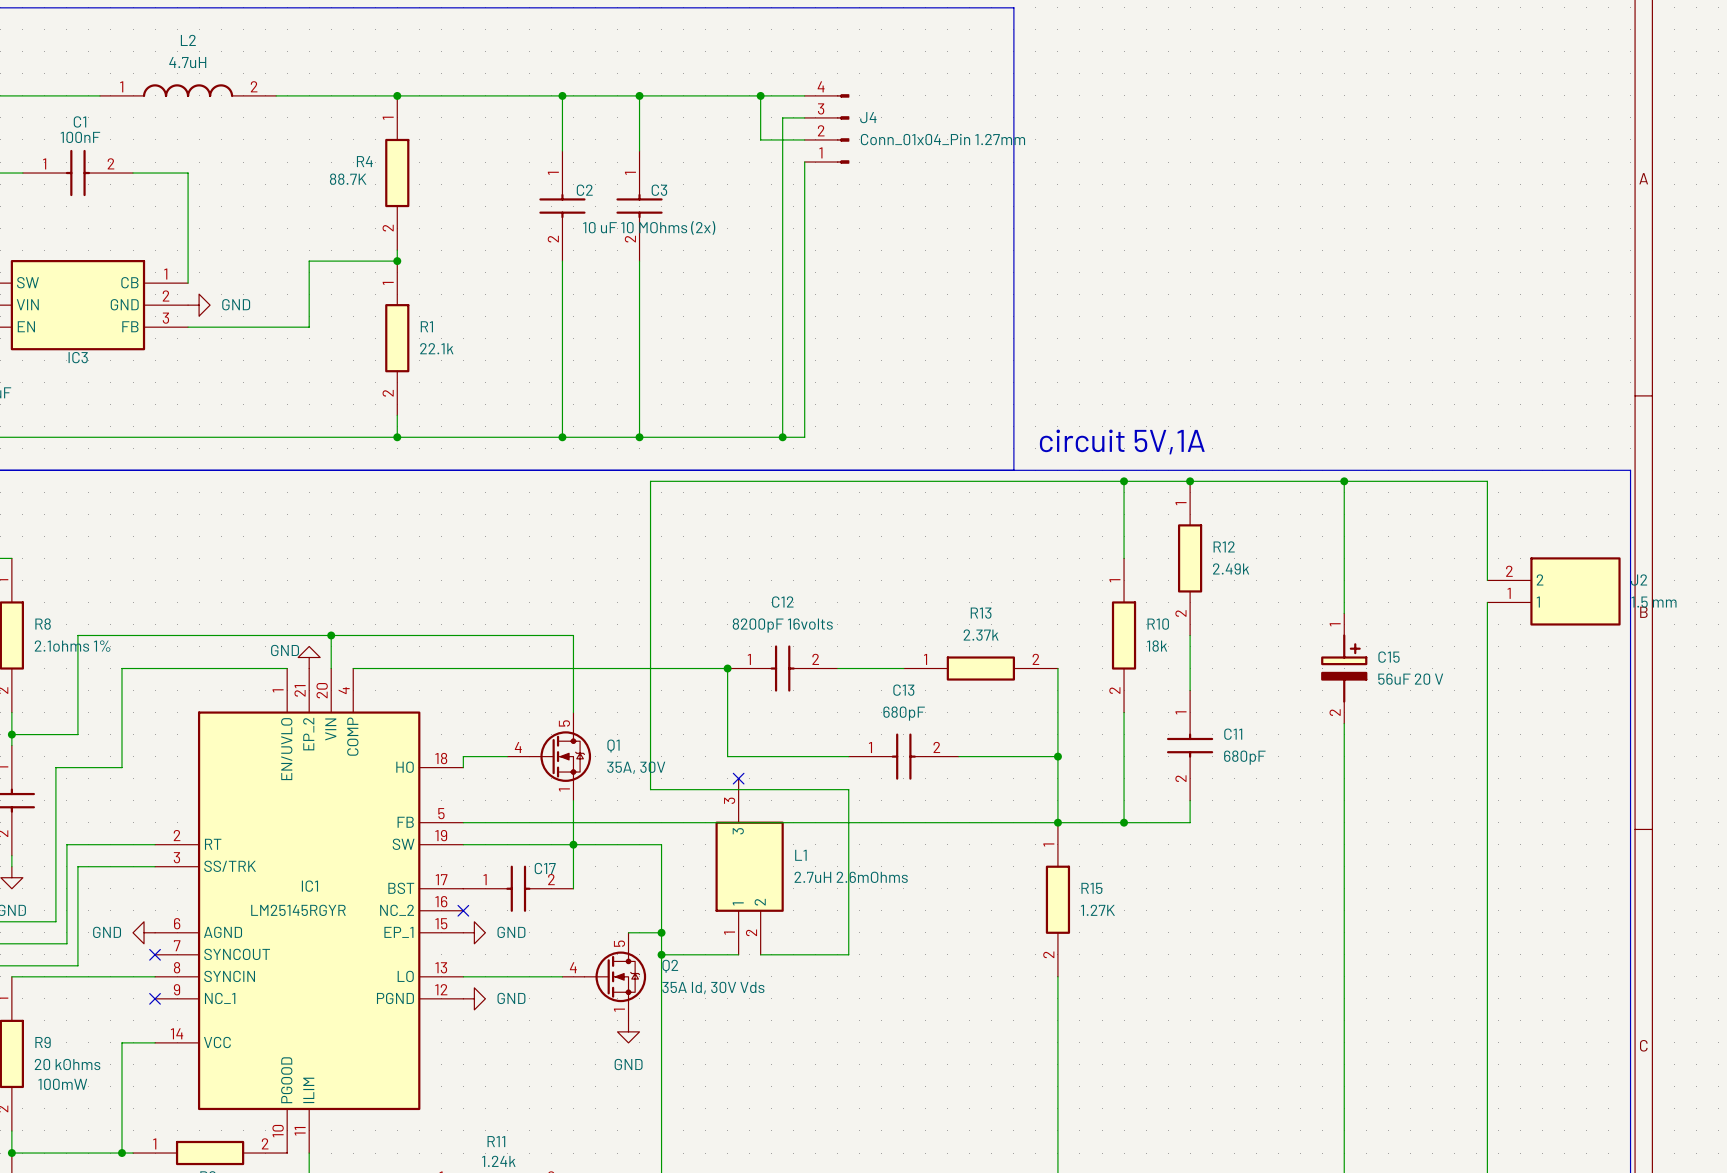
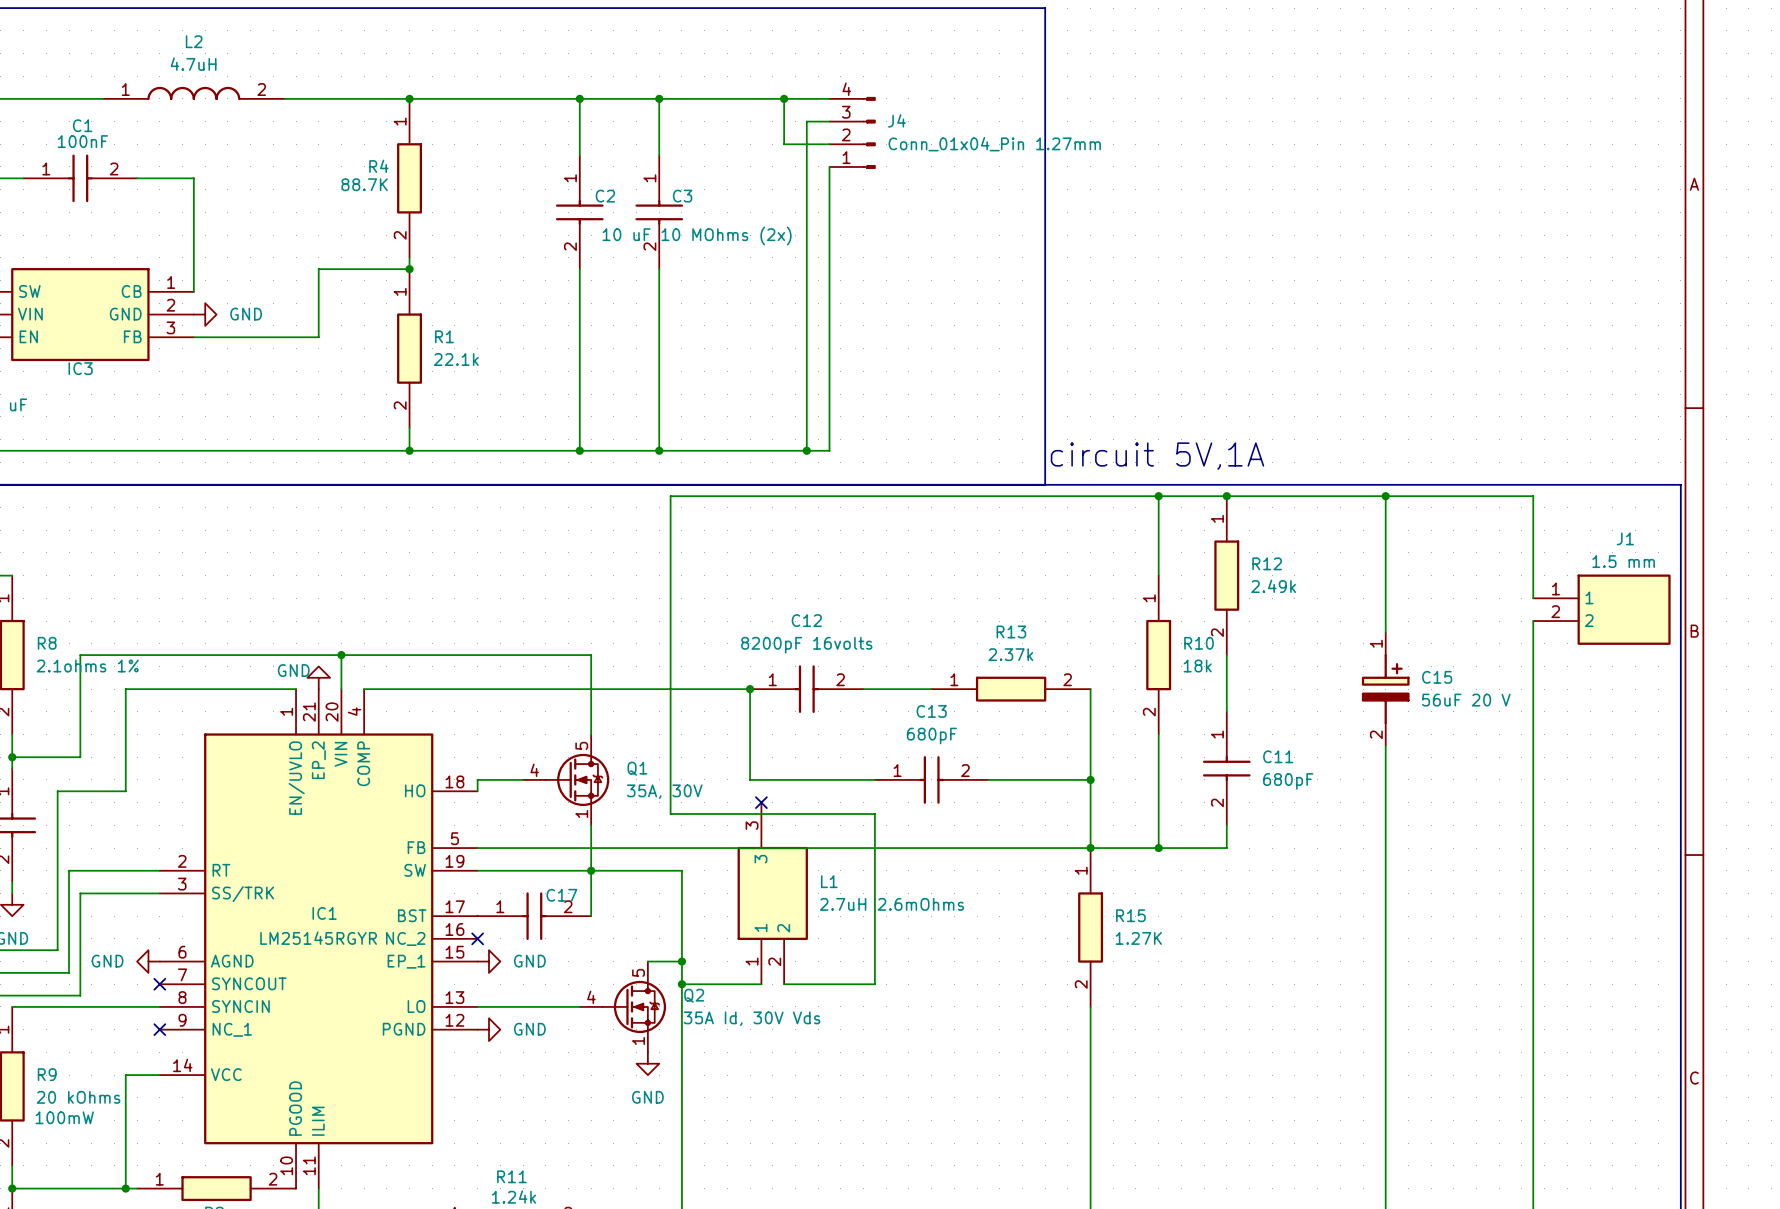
J2 name: J2 (1639, 580) -> J1 (1625, 538)
J2 flip: as is (1575, 591) -> up-down (1624, 609)
J2 value position: 1.5 mm (1653, 602) -> 1.5 mm (1623, 561)

